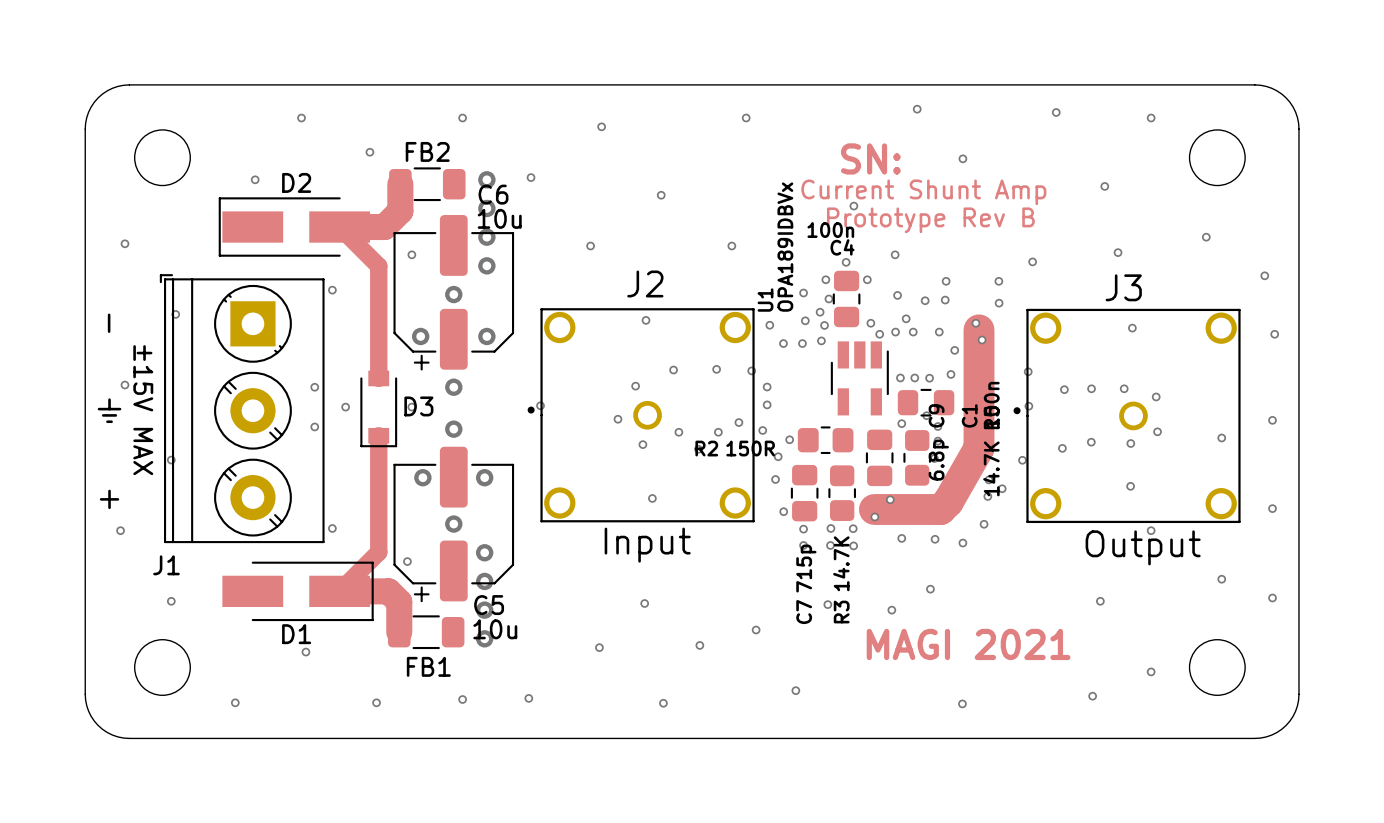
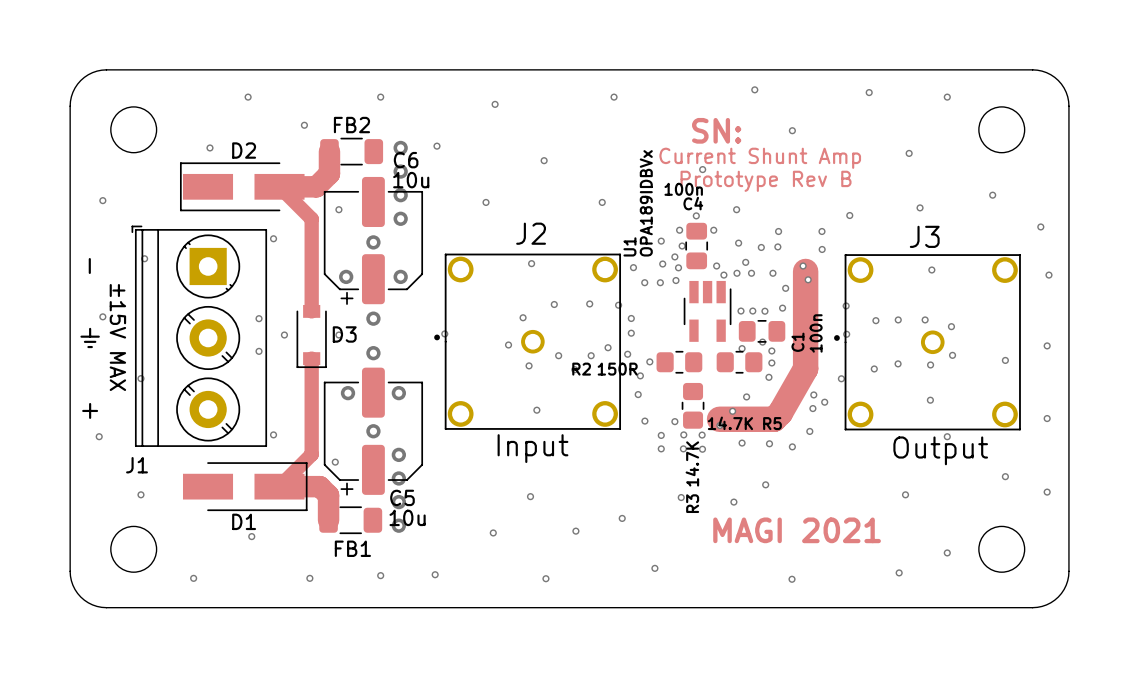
C9: 6.8p (879, 457) -> none
R5 rotation: 0° (917, 457) -> 90° clockwise (739, 362)
via: none -> (746, 396)
C7: 715p (804, 493) -> none
via: none -> (674, 421)

